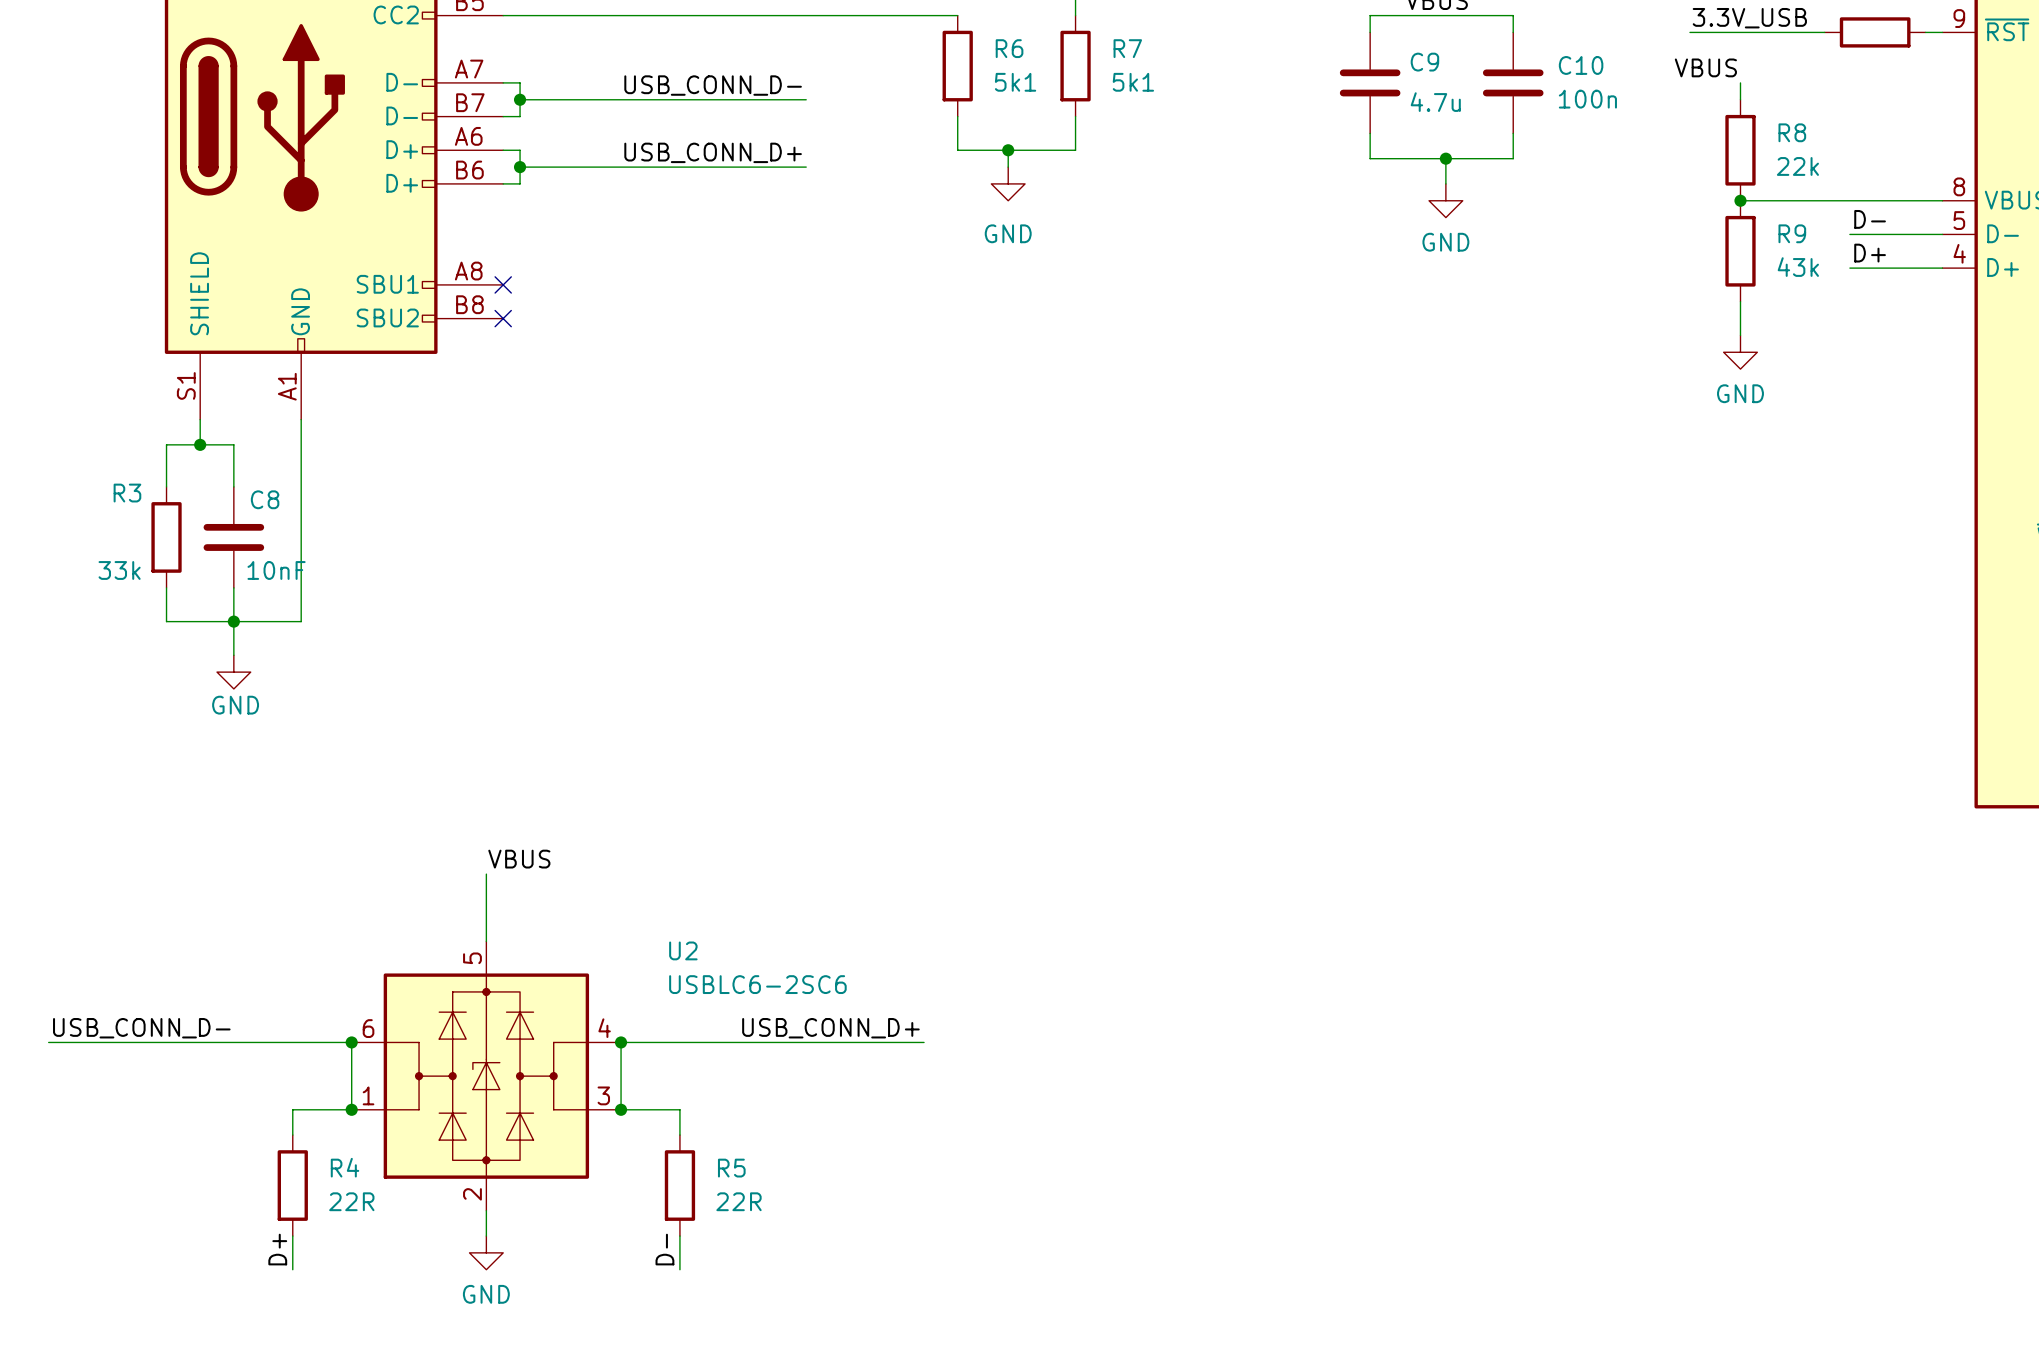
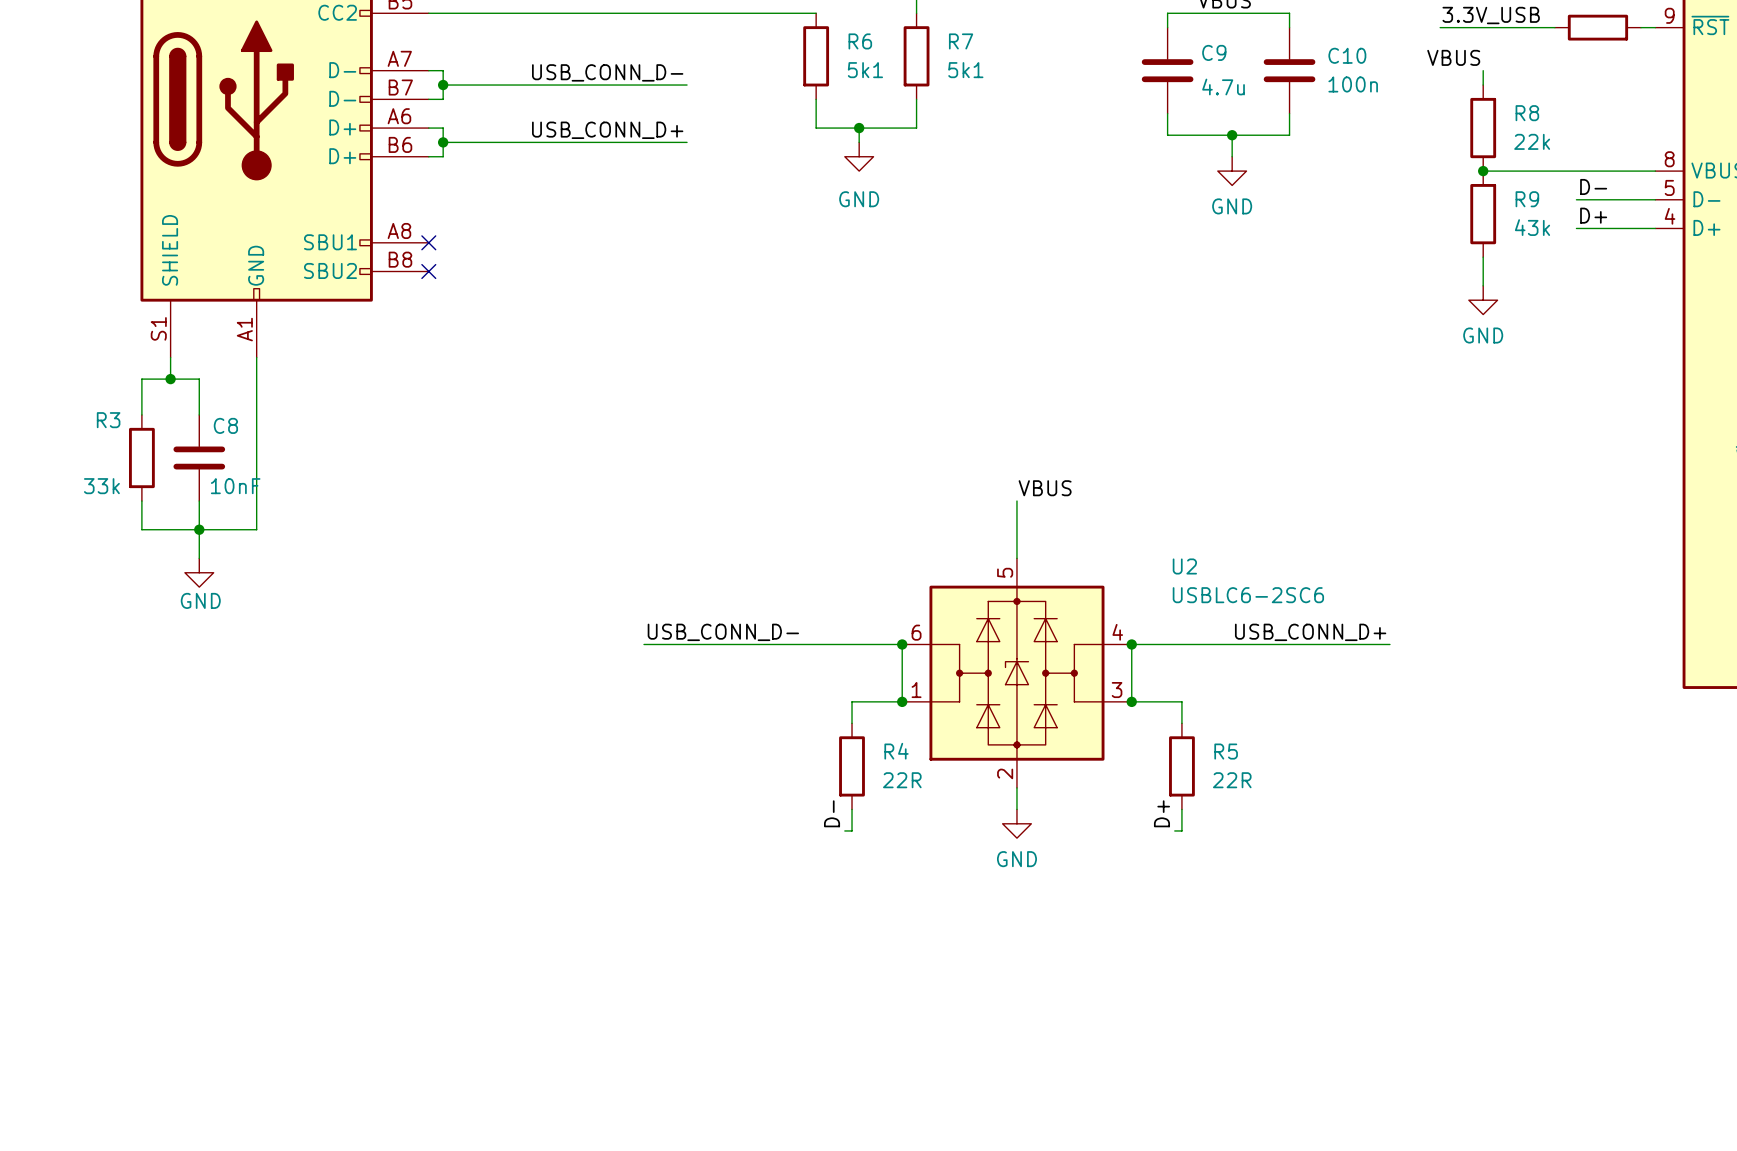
label: none -> VBUS (1045, 488)
wire: none -> (1016, 501) (1016, 558)
label: none -> USB_CONN_D- (723, 632)
label: none -> USB_CONN_D+ (1310, 632)
wire: none -> (643, 644) (902, 644) (902, 701) (852, 701) (852, 723)
junction: none -> (902, 644)
junction: none -> (1131, 644)
wire: none -> (1389, 644) (1131, 644) (1131, 701) (1181, 701) (1181, 723)
junction: none -> (902, 701)
junction: none -> (1131, 701)
label: VBUS (519, 859) -> none
wire: (486, 874) (486, 941) -> none
wire: none -> (1016, 787) (1016, 809)
wire: none -> (852, 809) (852, 830) (844, 830)
wire: none -> (1181, 809) (1181, 830) (1174, 830)
label: none -> D- (832, 813)
label: none -> D+ (1161, 813)
power symbol: none -> GND (1016, 823)
label: USB_CONN_D- (141, 1028) -> none
label: USB_CONN_D+ (830, 1028) -> none
wire: (48, 1042) (351, 1042) (351, 1109) (292, 1109) (292, 1135) -> none
junction: (351, 1042) -> none
junction: (621, 1042) -> none
wire: (924, 1042) (621, 1042) (621, 1109) (679, 1109) (679, 1135) -> none
U2 position: (486, 1076) -> (1016, 673)
junction: (351, 1109) -> none
junction: (621, 1109) -> none
R4 position: (292, 1185) -> (852, 766)
R5 position: (679, 1185) -> (1181, 766)
wire: (486, 1210) (486, 1236) -> none
wire: (292, 1236) (292, 1269) -> none
wire: (679, 1236) (679, 1269) -> none
label: D+ (277, 1249) -> none
label: D- (664, 1249) -> none
power symbol: GND (486, 1252) -> none

